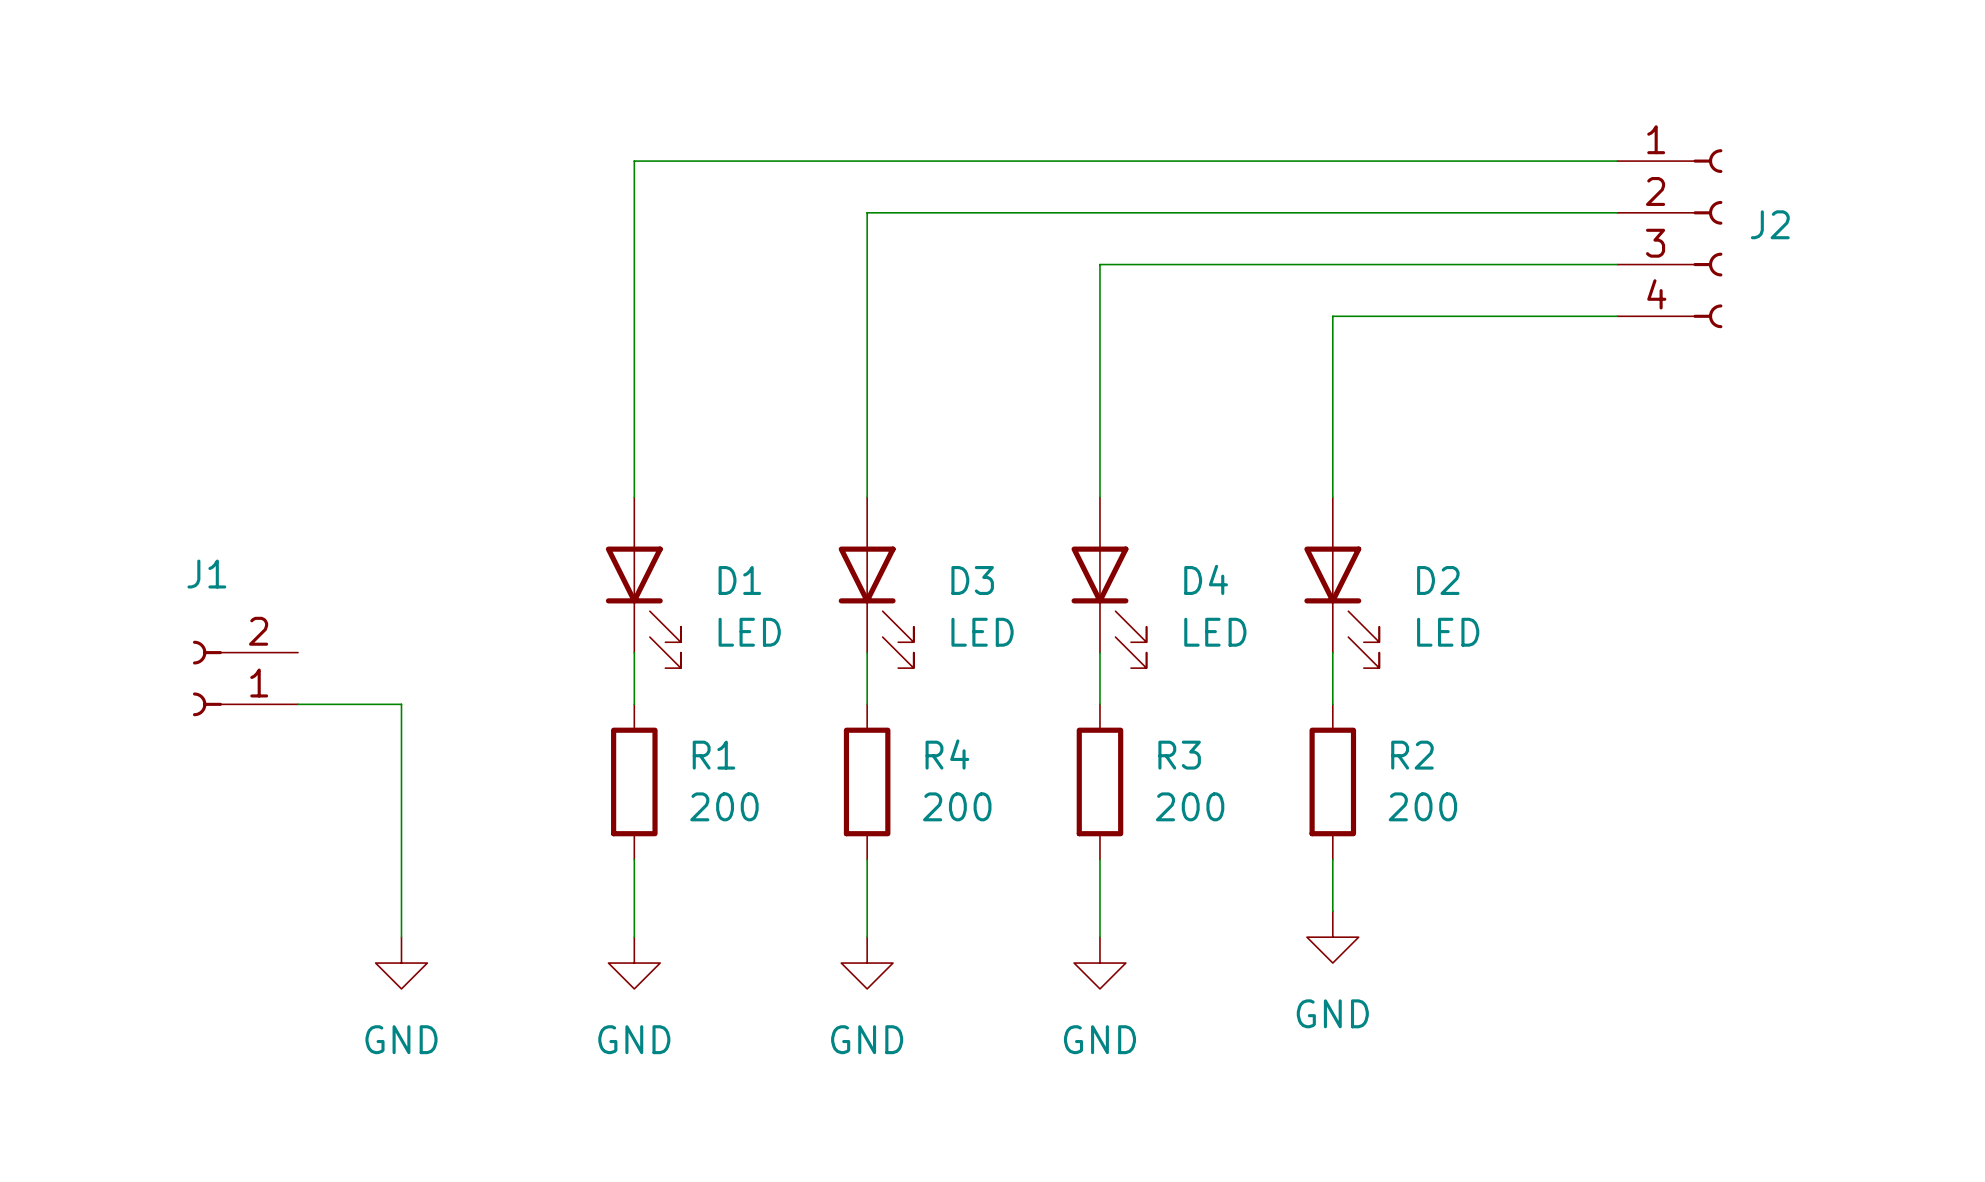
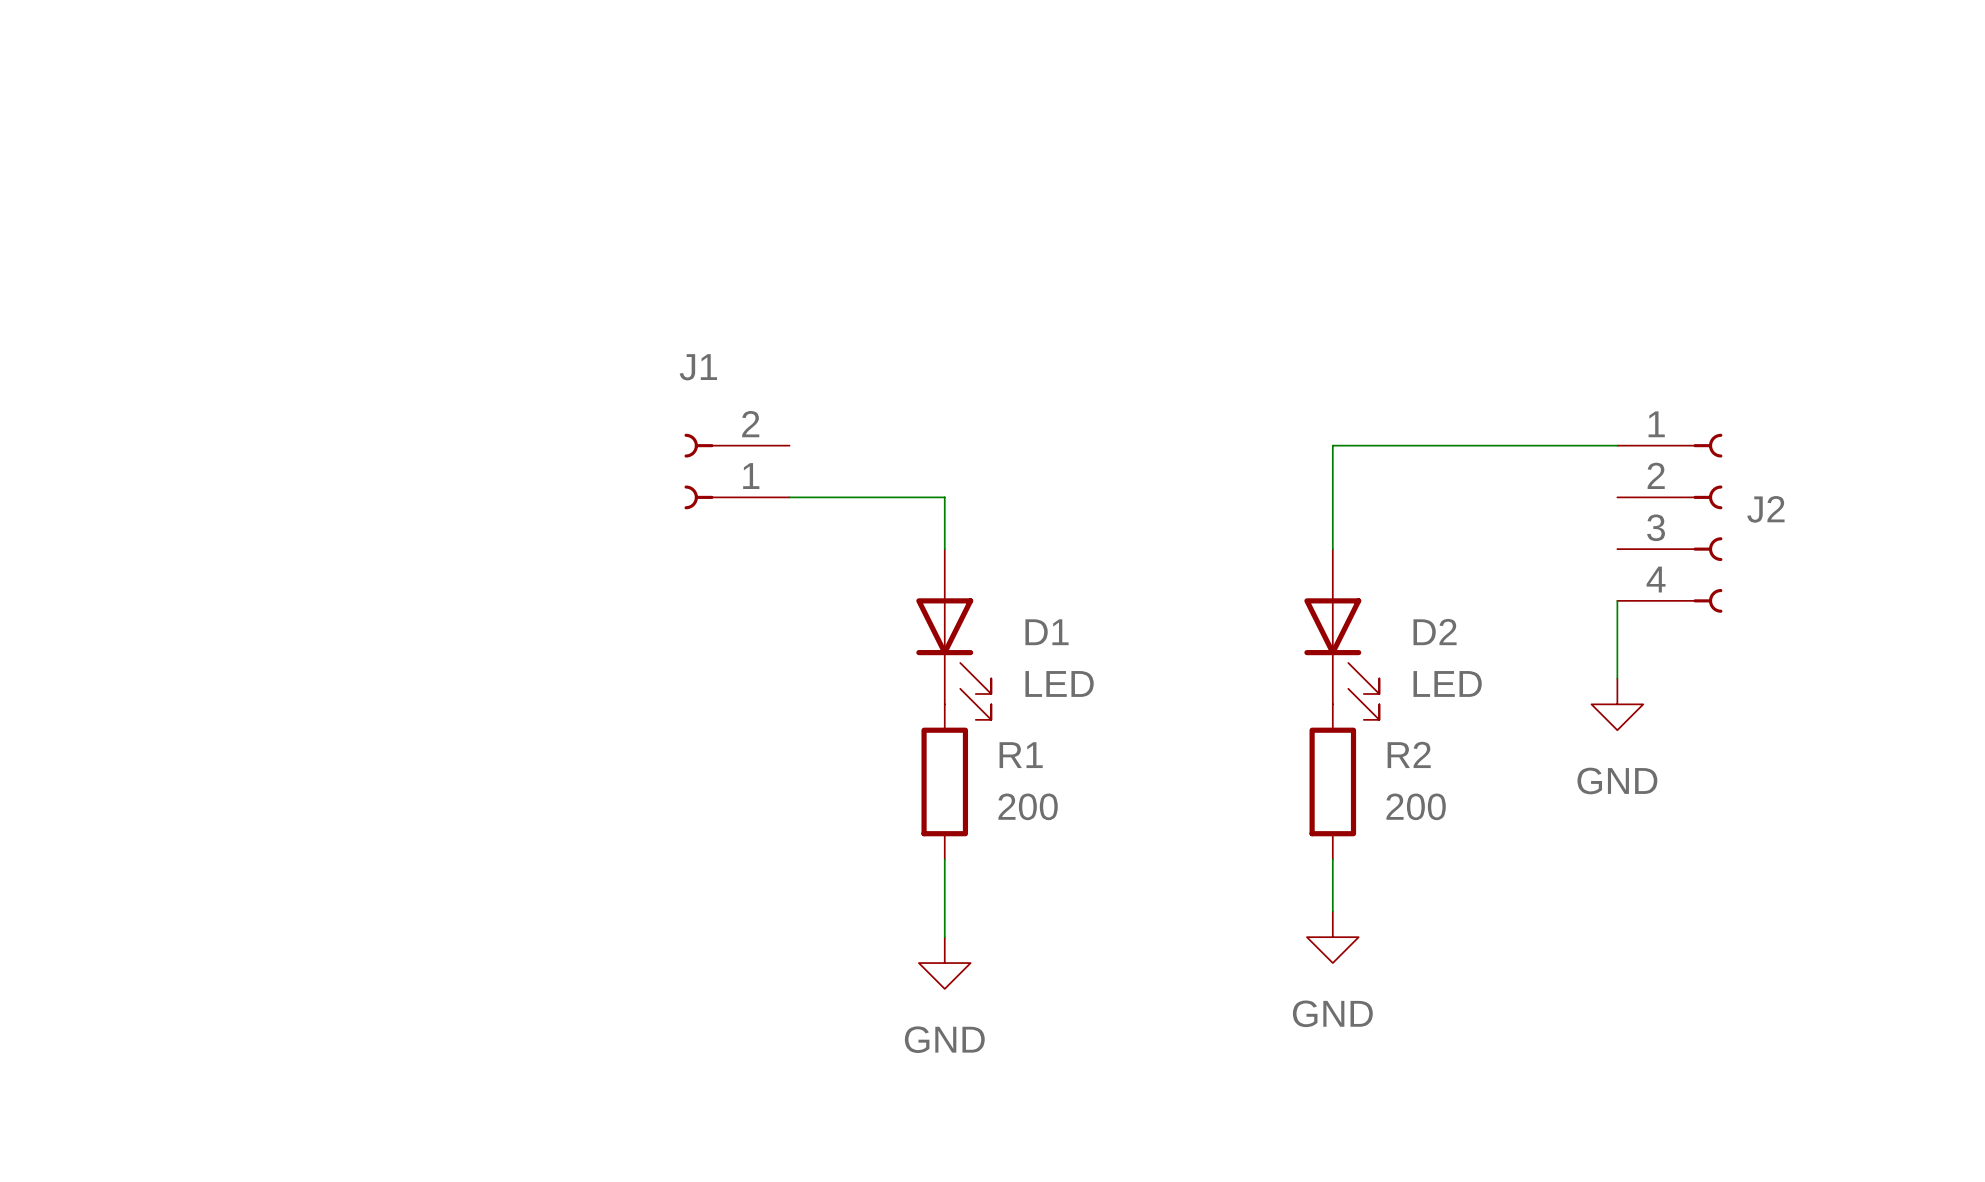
wire: (1617, 161) (634, 161) (634, 497) -> none
wire: (1617, 212) (867, 212) (867, 497) -> none
J2 position: (1669, 238) -> (1669, 523)
wire: (1617, 264) (1099, 264) (1099, 497) -> none
wire: (1617, 316) (1332, 316) (1332, 445) -> (1617, 445) (1332, 445)
wire: none -> (789, 497) (944, 497) (944, 549)
D1 position: (643, 582) -> (953, 634)
D3: LED (876, 582) -> none
D4: LED (1109, 582) -> none
D2 position: (1341, 582) -> (1341, 634)
wire: none -> (1617, 600) (1617, 678)
wire: (634, 652) (634, 704) -> none
wire: (867, 652) (867, 704) -> none
wire: (1099, 652) (1099, 704) -> none
J1 position: (245, 678) -> (737, 471)
wire: (298, 704) (401, 704) (401, 937) -> none
power symbol: none -> GND (1617, 704)
R1 position: (634, 781) -> (944, 781)
R4: 200 (867, 781) -> none
R3: 200 (1099, 781) -> none
wire: (634, 859) (634, 937) -> none
wire: (867, 859) (867, 937) -> (944, 859) (944, 937)
wire: (1099, 859) (1099, 937) -> none
power symbol: GND (401, 963) -> none
power symbol: GND (634, 963) -> none
power symbol: GND (867, 963) -> none
power symbol: none -> GND (944, 963)
power symbol: GND (1099, 963) -> none

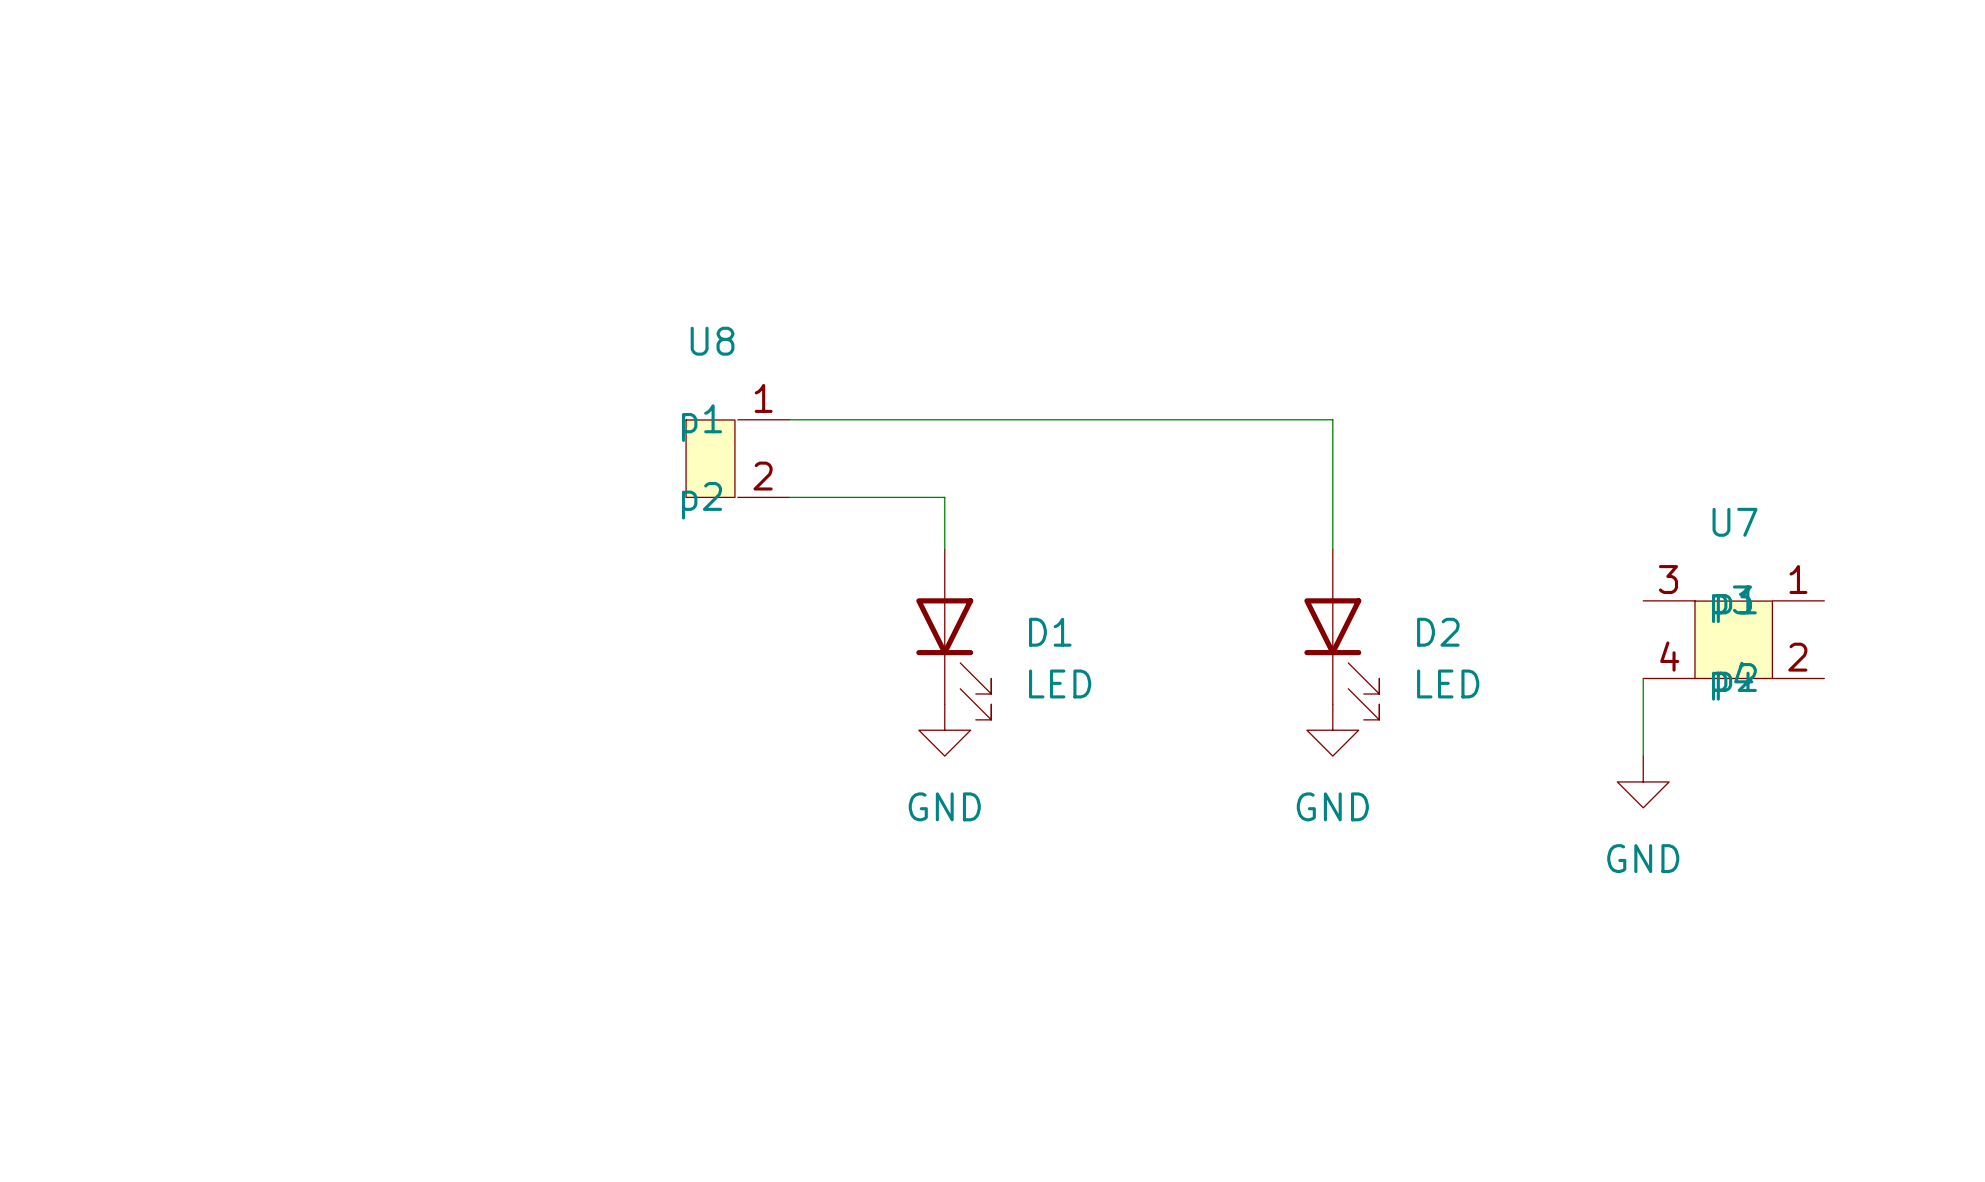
wire: (1332, 445) (1617, 445) -> (1332, 445) (1332, 419) (789, 419)
U8: none -> (737, 458)
J1: (737, 471) -> none
J2: (1669, 523) -> none
wire: (1617, 600) (1617, 678) -> (1643, 678) (1643, 756)
U7: none -> (1733, 639)
power symbol position: GND (1617, 704) -> GND (1643, 781)
power symbol: none -> GND (944, 730)
power symbol: none -> GND (1332, 730)
R1: 200 (944, 781) -> none
R2: 200 (1332, 781) -> none
wire: (944, 859) (944, 937) -> none
wire: (1332, 859) (1332, 911) -> none
power symbol: GND (1332, 937) -> none
power symbol: GND (944, 963) -> none

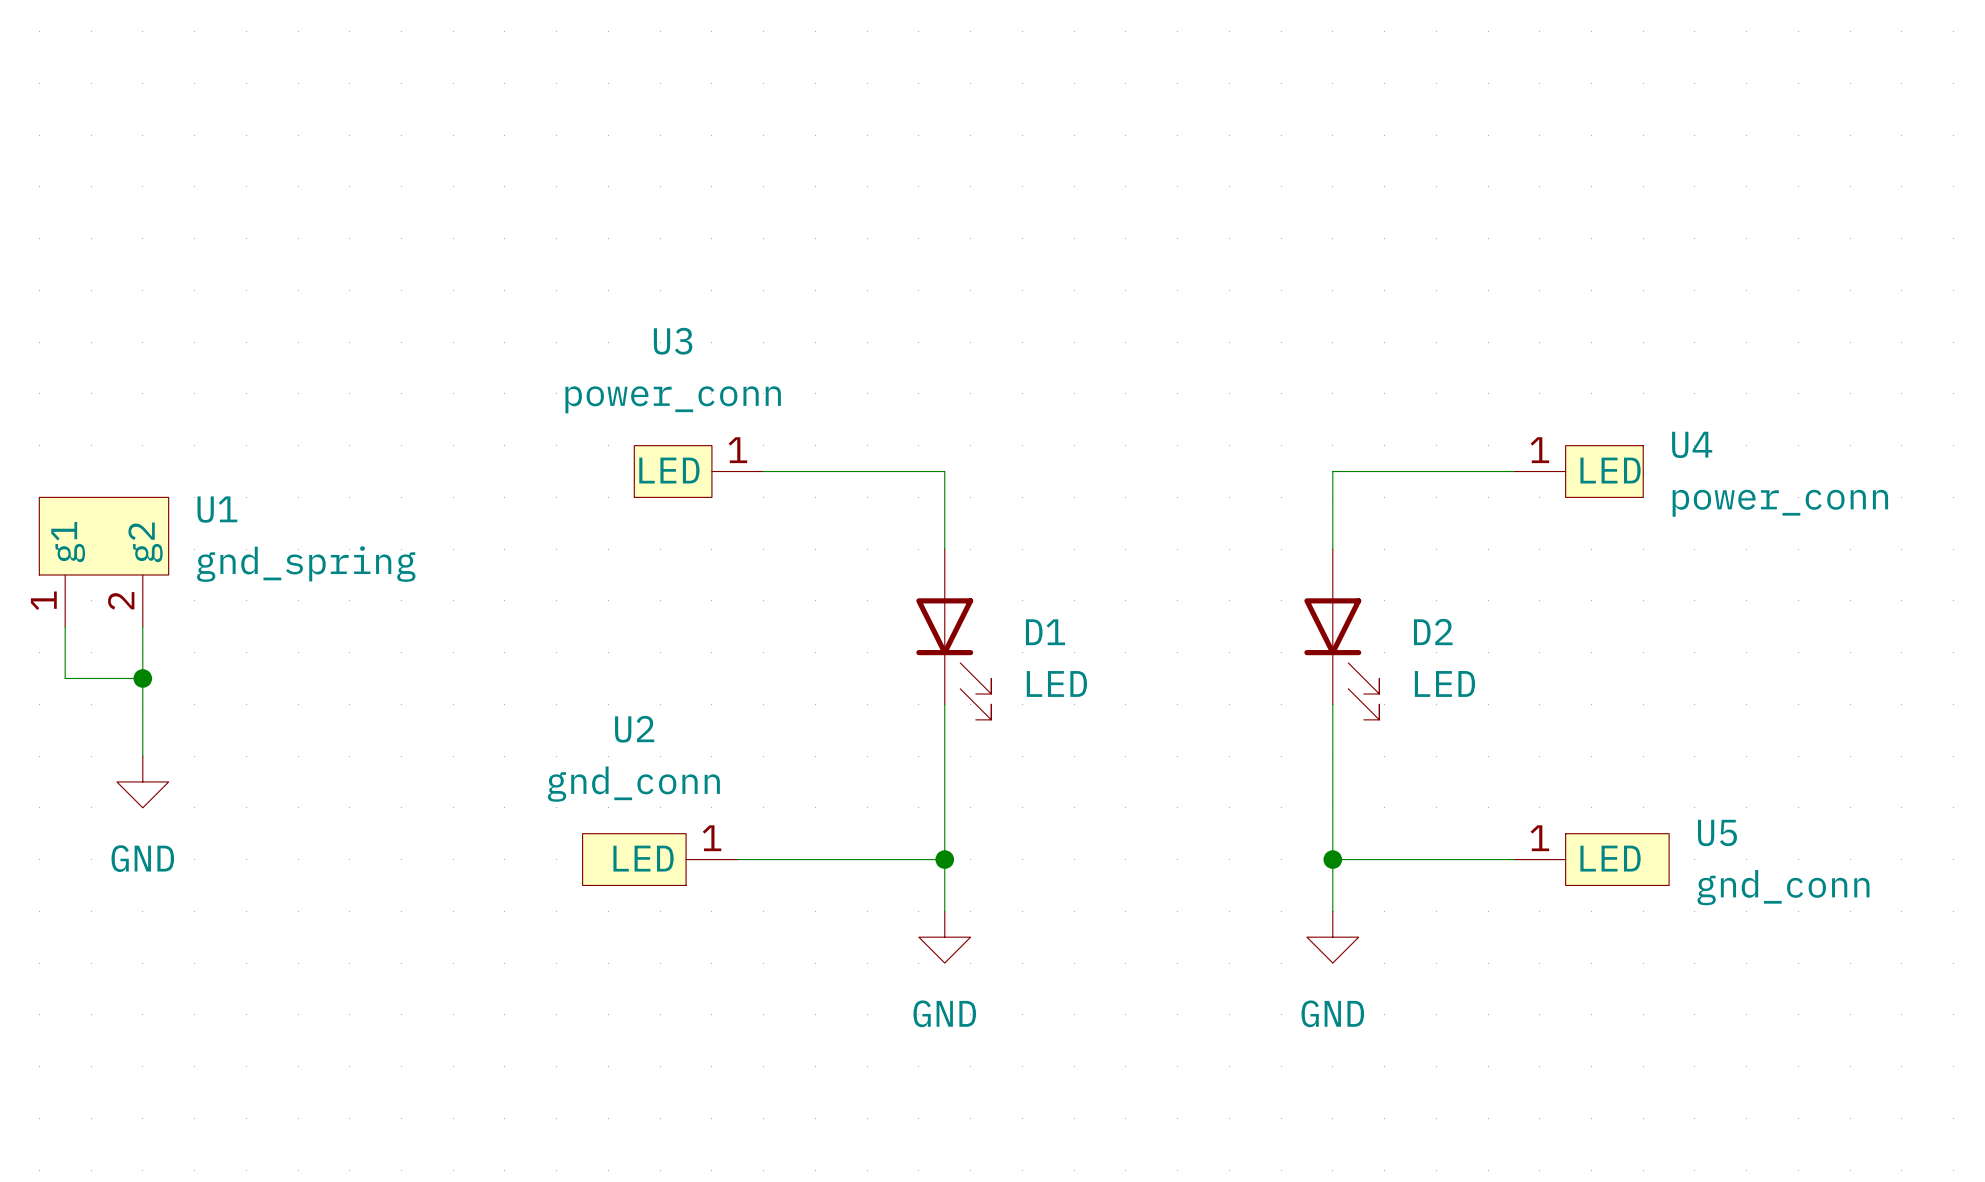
wire: (789, 419) (1332, 419) (1332, 471) -> (1513, 471) (1332, 471)
U8: (737, 458) -> none
U3: none -> power_conn (698, 471)
U4: none -> power_conn (1578, 471)
wire: (789, 497) (944, 497) -> (763, 471) (944, 471) (944, 497)
U1: none -> gnd_spring (103, 562)
wire: none -> (65, 626) (65, 678) (142, 678)
wire: none -> (142, 626) (142, 756)
U7: (1733, 639) -> none
junction: none -> (142, 678)
wire: (1643, 678) (1643, 756) -> none
wire: none -> (944, 704) (944, 911)
wire: none -> (1332, 704) (1332, 911)
power symbol position: GND (944, 730) -> GND (944, 937)
power symbol: GND (1332, 730) -> none
power symbol: none -> GND (142, 781)
power symbol: GND (1643, 781) -> none
U2: none -> gnd_conn (660, 859)
wire: none -> (737, 859) (944, 859)
junction: none -> (944, 859)
wire: none -> (1332, 859) (1513, 859)
junction: none -> (1332, 859)
U5: none -> gnd_conn (1591, 859)
power symbol: none -> GND (1332, 937)

